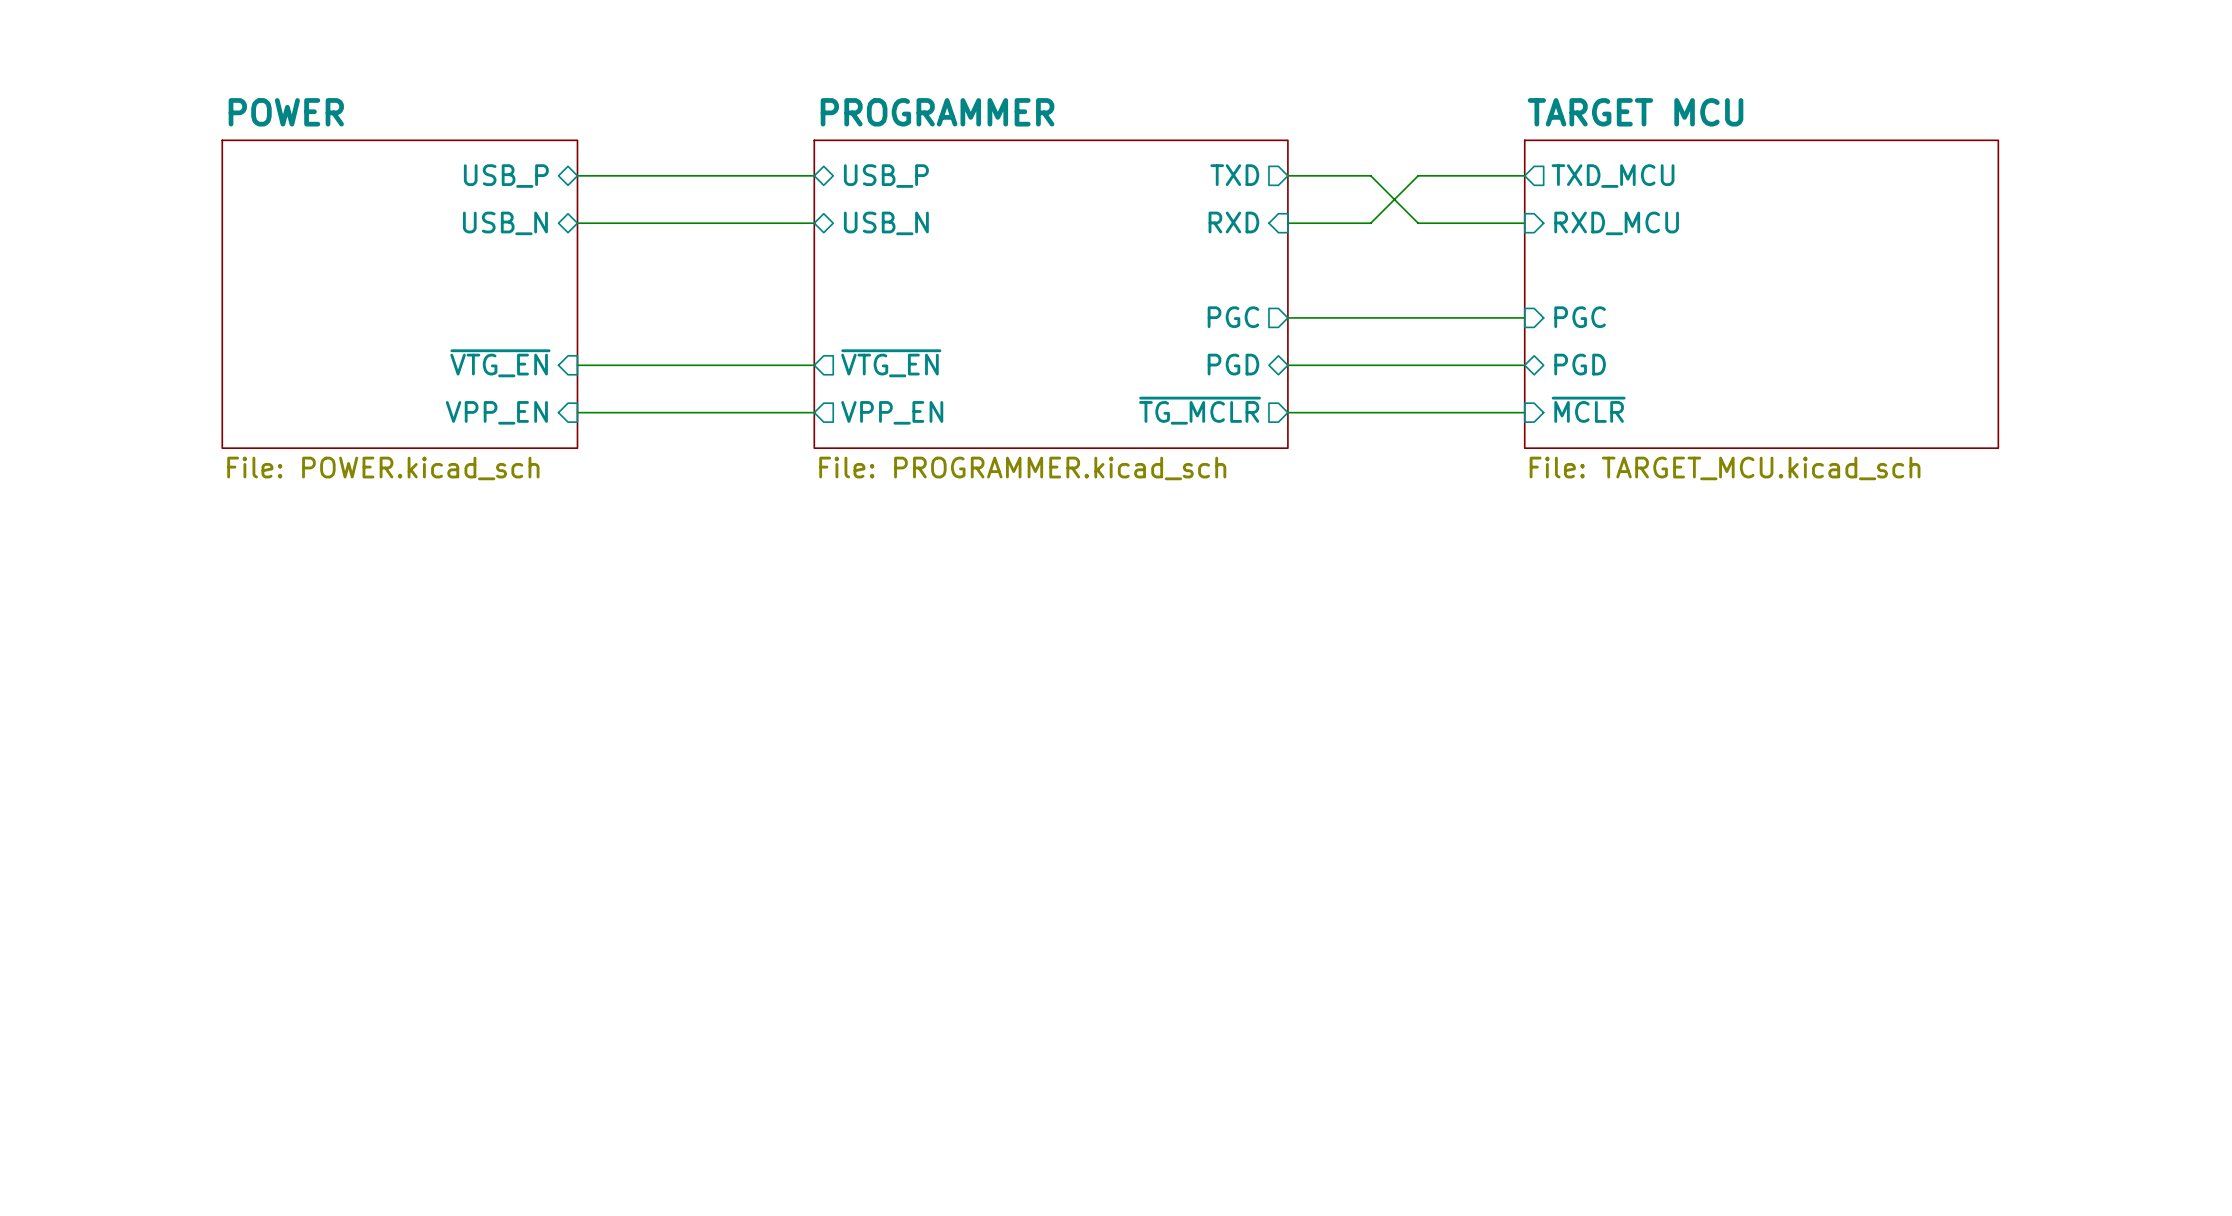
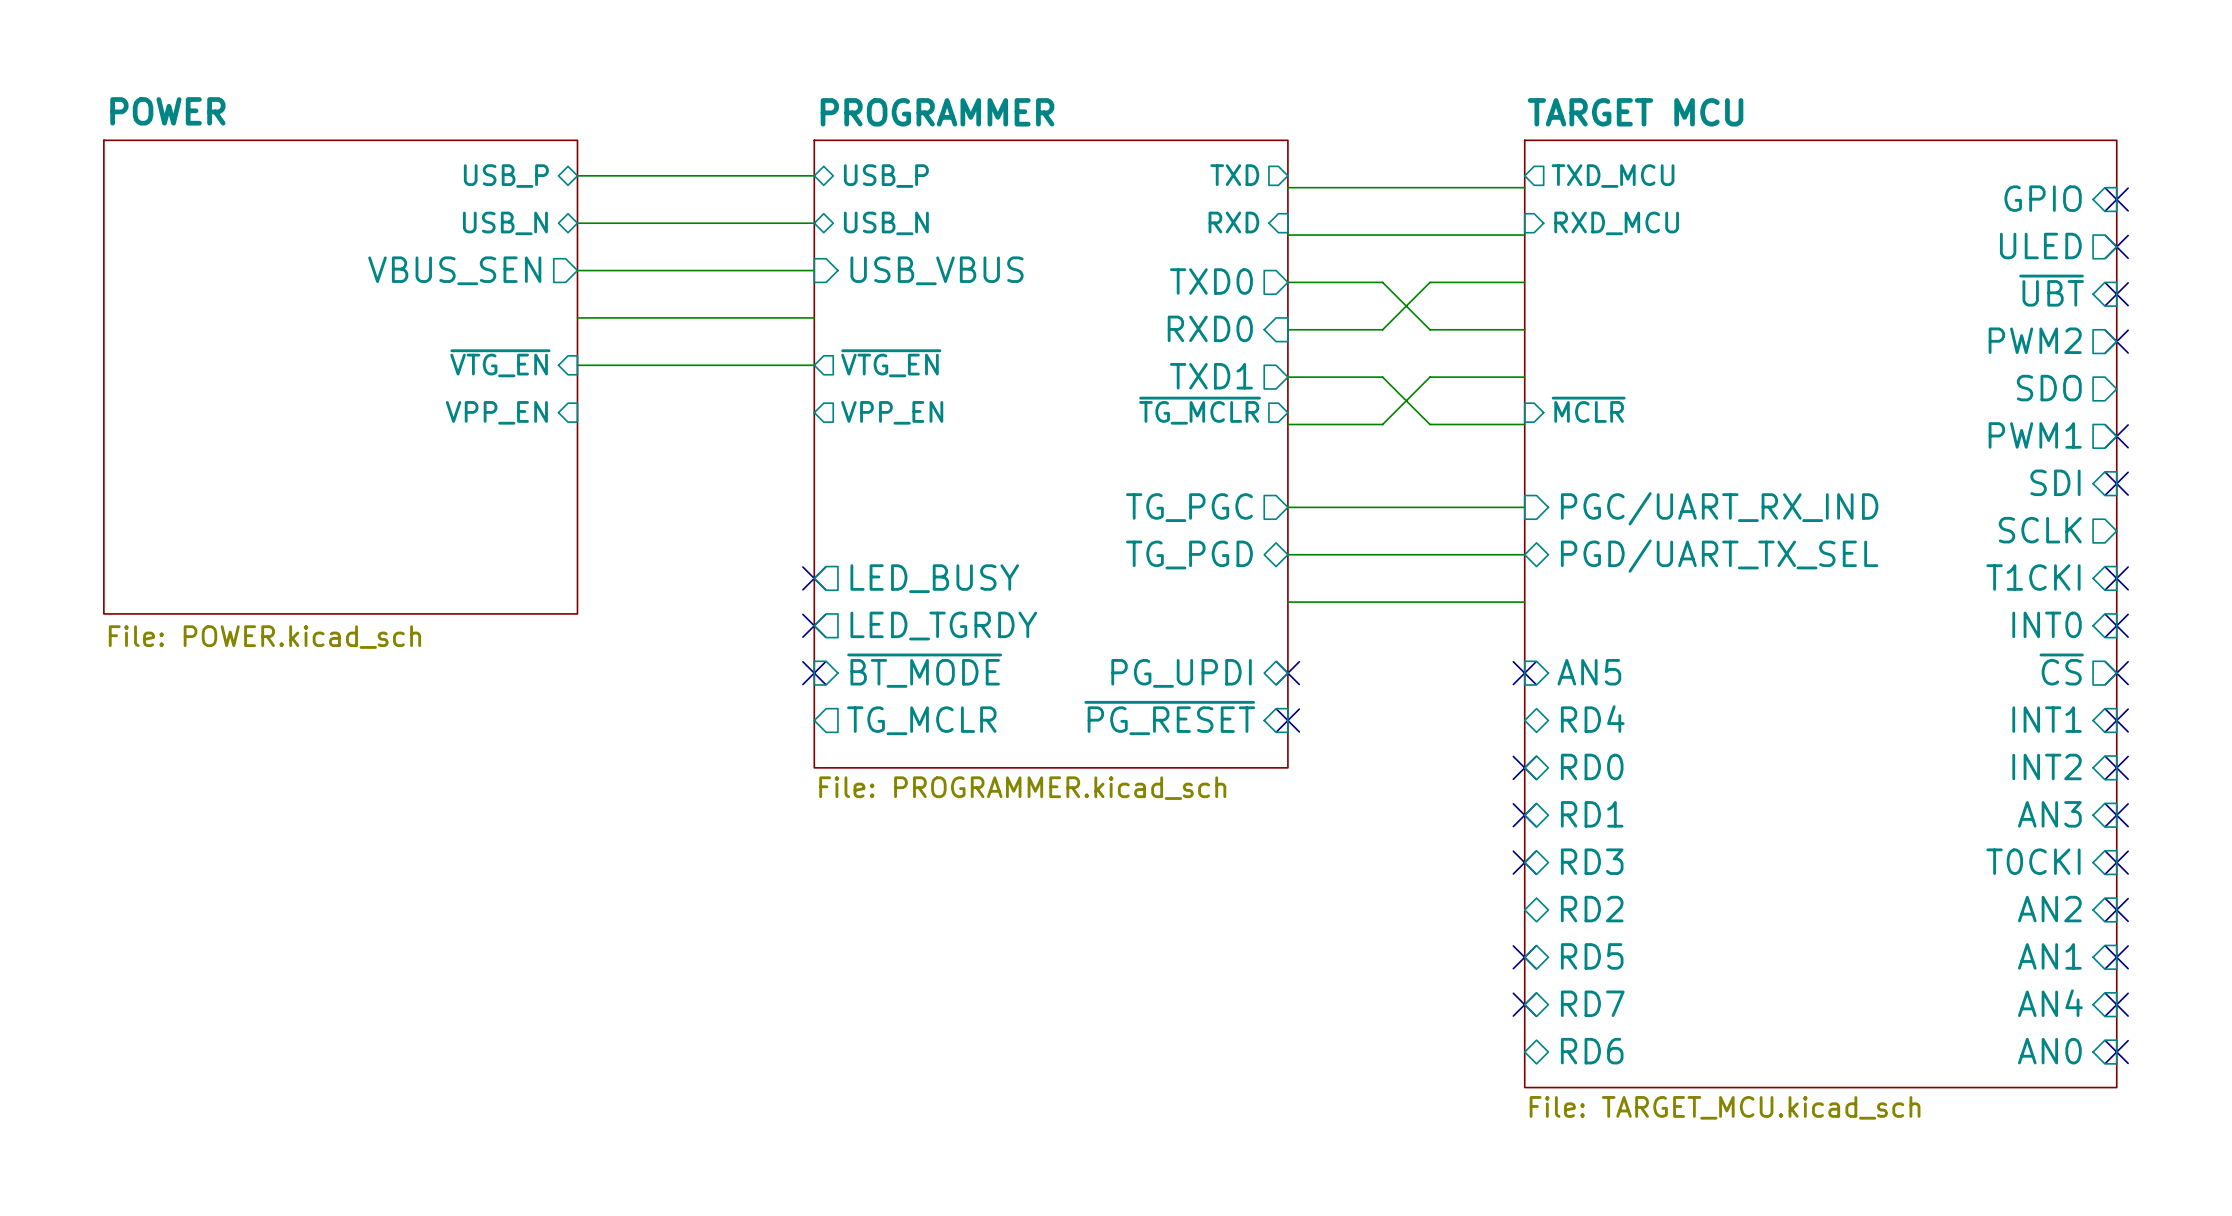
wire: (1287, 175) (1370, 175) (1418, 223) (1524, 223) -> none
wire: (1524, 175) (1418, 175) (1370, 223) (1287, 223) -> none
wire: none -> (1287, 187) (1524, 187)
sheet pin: none -> GPIO (2043, 198)
no-connect mark: none -> (2116, 199)
wire: none -> (1287, 235) (1524, 235)
sheet pin: none -> ULED (2040, 246)
no-connect mark: none -> (2116, 246)
sheet pin: none -> VBUS_SEN (454, 270)
wire: none -> (577, 270) (814, 270)
sheet pin: none -> USB_VBUS (937, 270)
sheet pin: none -> TXD0 (1211, 281)
wire: none -> (1287, 282) (1382, 282) (1430, 329) (1524, 329)
wire: none -> (1524, 282) (1430, 282) (1382, 329) (1287, 329)
sheet pin: none -> ~{UBT} (2051, 290)
sheet POWER: File: POWER.kicad_sch (399, 294) -> none
sheet PROGRAMMER: File: PROGRAMMER.kicad_sch (1051, 294) -> none
sheet TARGET MCU: File: TARGET_MCU.kicad_sch (1761, 294) -> none
no-connect mark: none -> (2116, 294)
sheet pin shape: output (1233, 317) -> input (1210, 328)
sheet pin: PGC (1233, 317) -> RXD0 (1210, 328)
wire: (1287, 317) (1524, 317) -> (1287, 507) (1524, 507)
sheet pin: PGC (1580, 317) -> none
sheet pin: none -> PWM2 (2035, 340)
no-connect mark: none -> (2116, 341)
sheet pin shape: bidirectional (1233, 364) -> output (1211, 376)
sheet pin: PGD (1233, 364) -> TXD1 (1211, 376)
sheet pin: PGD (1580, 364) -> none
wire: (1287, 365) (1524, 365) -> (1287, 554) (1524, 554)
sheet POWER: none -> File: POWER.kicad_sch (340, 377)
wire: none -> (1287, 377) (1382, 377) (1430, 424) (1524, 424)
wire: none -> (1524, 377) (1430, 377) (1382, 424) (1287, 424)
sheet pin: none -> SDO (2049, 388)
wire: (577, 412) (814, 412) -> (577, 317) (814, 317)
wire: (1287, 412) (1524, 412) -> (1287, 602) (1524, 602)
sheet pin: none -> PWM1 (2035, 435)
no-connect mark: none -> (2116, 436)
sheet PROGRAMMER: none -> File: PROGRAMMER.kicad_sch (1051, 454)
sheet pin: none -> SDI (2055, 482)
no-connect mark: none -> (2116, 483)
sheet pin: none -> TG_PGC (1189, 507)
sheet pin: none -> PGC/UART_RX_IND (1719, 508)
sheet pin: none -> SCLK (2040, 530)
sheet pin: none -> TG_PGD (1189, 554)
sheet pin: none -> PGD/UART_TX_SEL (1719, 556)
sheet pin: none -> T1CKI (2033, 577)
no-connect mark: none -> (814, 578)
sheet pin: none -> LED_BUSY (934, 578)
no-connect mark: none -> (2116, 578)
sheet TARGET MCU: none -> File: TARGET_MCU.kicad_sch (1820, 613)
sheet pin: none -> INT0 (2047, 624)
no-connect mark: none -> (814, 625)
no-connect mark: none -> (2116, 625)
sheet pin: none -> LED_TGRDY (943, 626)
sheet pin: none -> ~{CS} (2061, 669)
sheet pin: none -> ~{BT_MODE} (924, 670)
sheet pin: none -> AN5 (1589, 672)
no-connect mark: none -> (814, 673)
sheet pin: none -> PG_UPDI (1181, 673)
no-connect mark: none -> (1287, 673)
no-connect mark: none -> (1524, 673)
no-connect mark: none -> (2116, 673)
sheet pin: none -> ~{PG_RESET} (1169, 718)
sheet pin: none -> RD4 (1592, 719)
sheet pin: none -> INT1 (2047, 719)
sheet pin: none -> TG_MCLR (921, 720)
no-connect mark: none -> (1287, 720)
no-connect mark: none -> (2116, 720)
sheet pin: none -> RD0 (1592, 766)
sheet pin: none -> INT2 (2047, 766)
no-connect mark: none -> (1524, 767)
no-connect mark: none -> (2116, 767)
sheet pin: none -> RD1 (1592, 814)
sheet pin: none -> AN3 (2049, 814)
no-connect mark: none -> (1524, 815)
no-connect mark: none -> (2116, 815)
sheet pin: none -> RD3 (1592, 861)
sheet pin: none -> T0CKI (2033, 861)
no-connect mark: none -> (1524, 862)
no-connect mark: none -> (2116, 862)
sheet pin: none -> RD2 (1592, 909)
sheet pin: none -> AN2 (2049, 909)
no-connect mark: none -> (2116, 909)
sheet pin: none -> RD5 (1592, 956)
sheet pin: none -> AN1 (2049, 956)
no-connect mark: none -> (1524, 957)
no-connect mark: none -> (2116, 957)
sheet pin: none -> RD7 (1592, 1003)
sheet pin: none -> AN4 (2050, 1003)
no-connect mark: none -> (1524, 1004)
no-connect mark: none -> (2116, 1004)
sheet pin: none -> RD6 (1592, 1051)
sheet pin: none -> AN0 (2049, 1051)
no-connect mark: none -> (2116, 1052)

